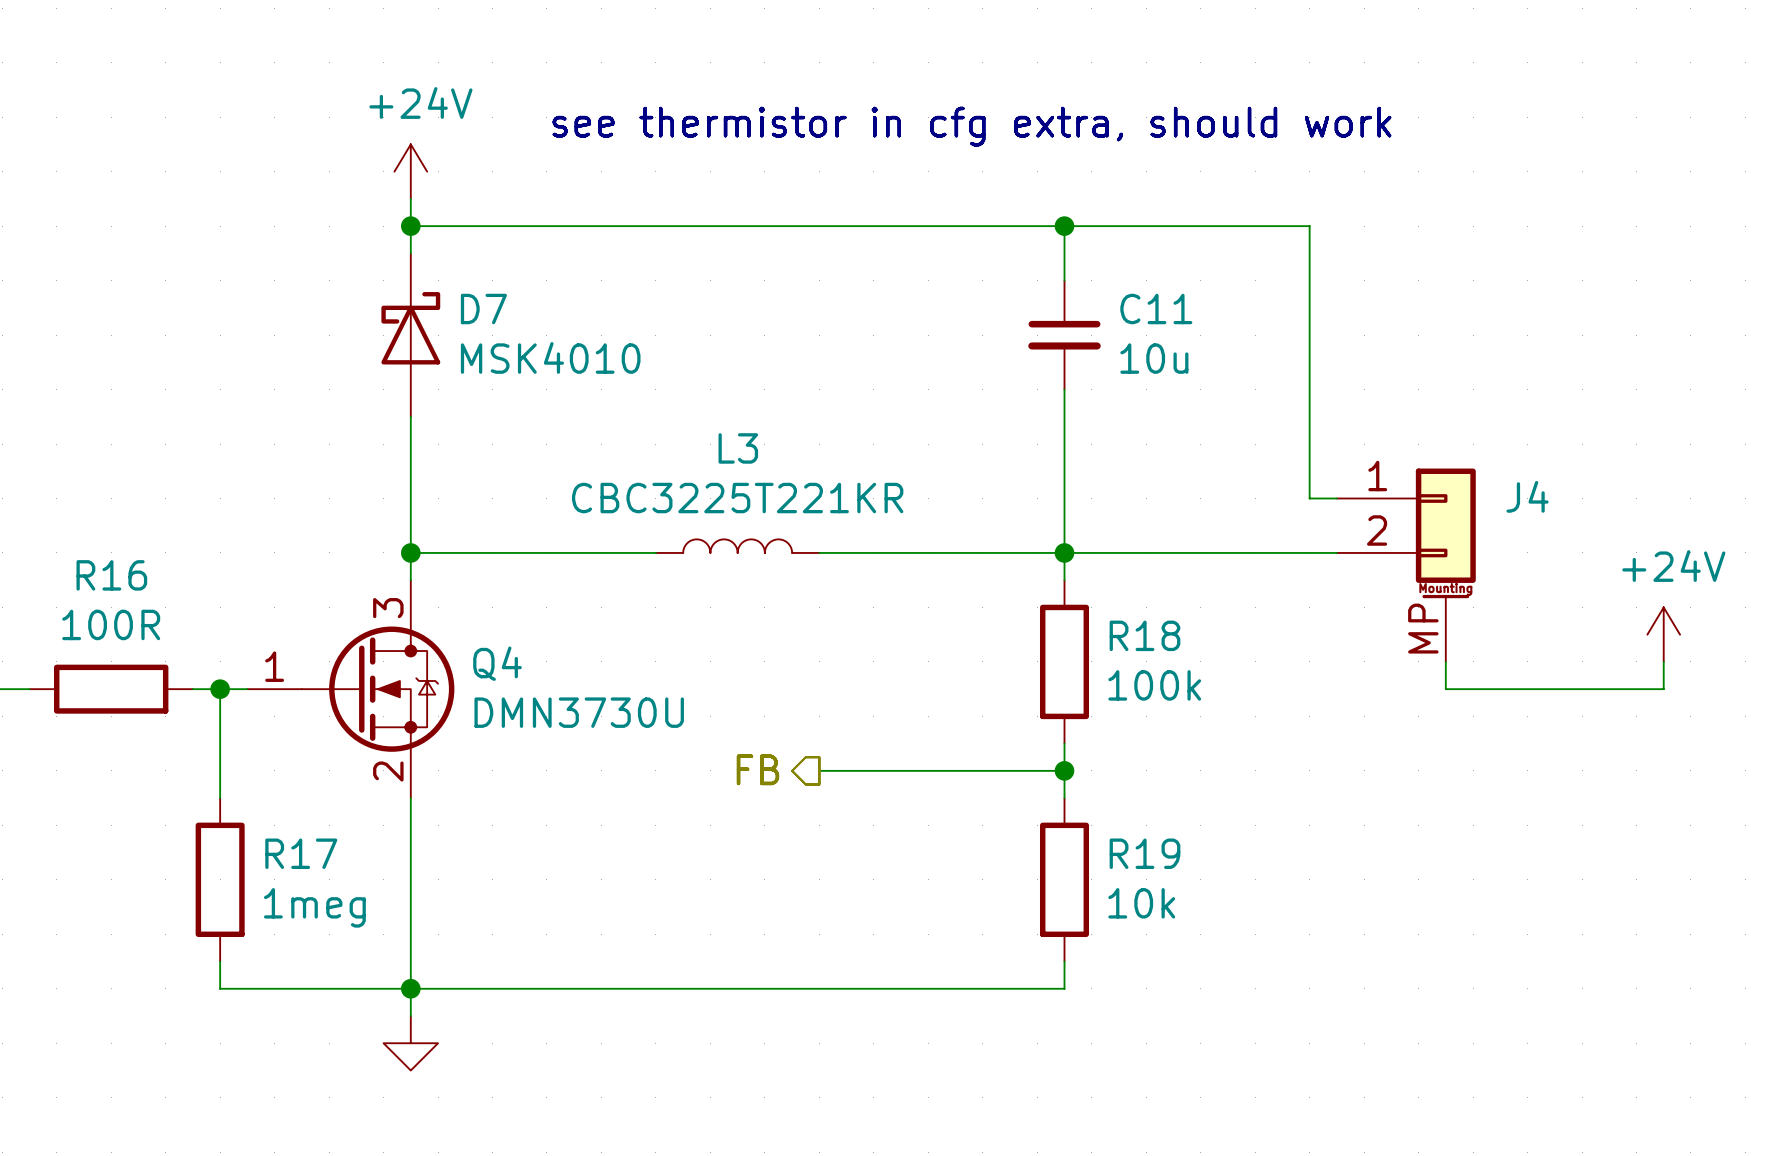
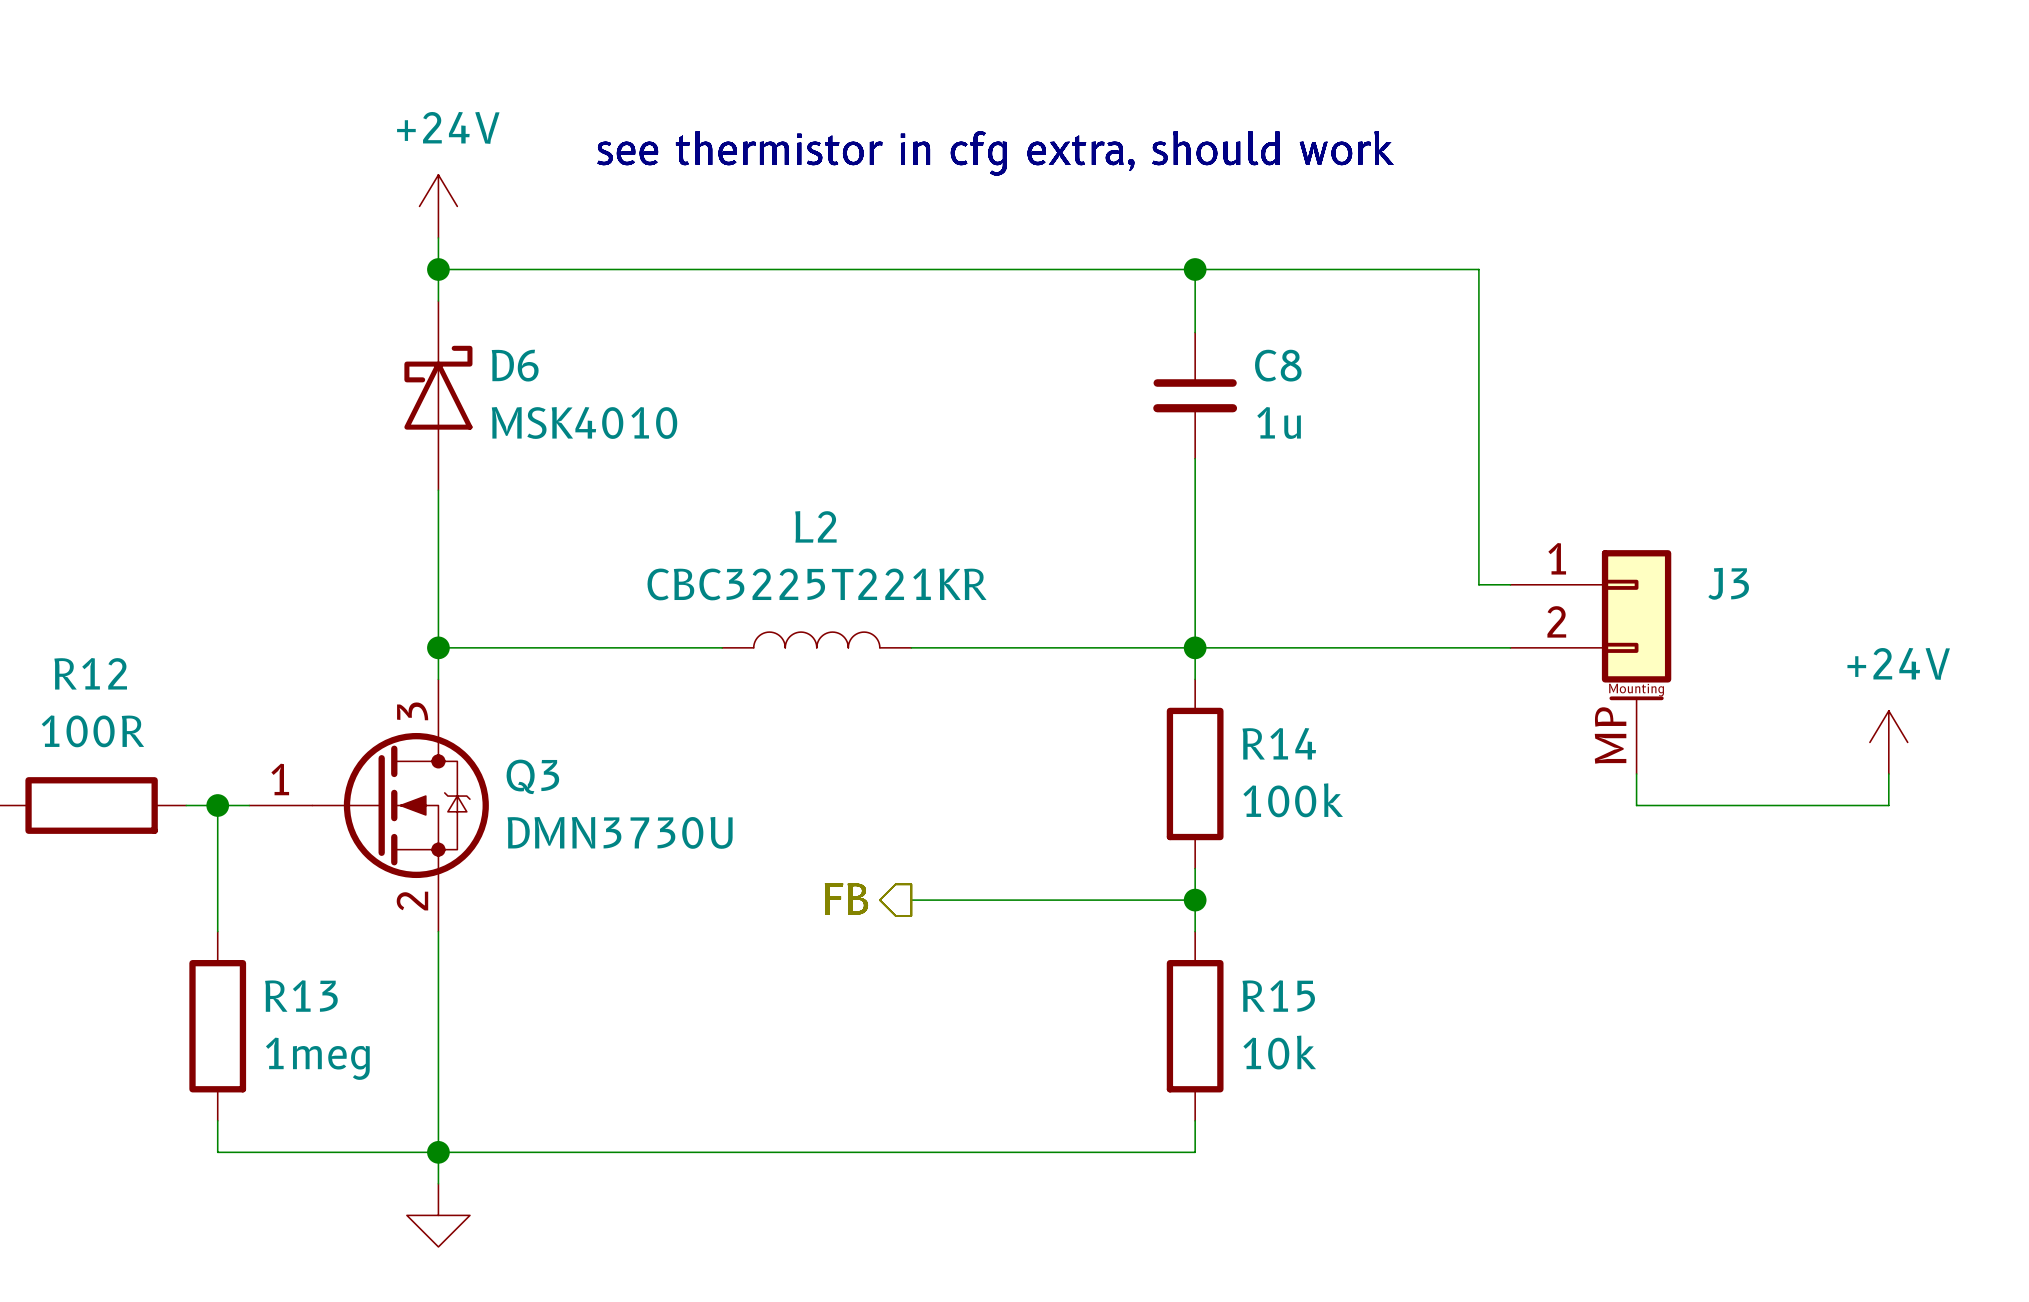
D7 name: D7 (483, 309) -> D6 (515, 365)
C11 name: C11 (1156, 309) -> C8 (1278, 365)
C11 value: 10u (1154, 358) -> 1u (1279, 422)
L3 name: L3 (738, 448) -> L2 (815, 526)
J4 name: J4 (1527, 496) -> J3 (1728, 583)
R16 name: R16 (111, 575) -> R12 (90, 673)
R18 name: R18 (1144, 635) -> R14 (1279, 743)
Q4 name: Q4 (497, 663) -> Q3 (532, 776)
R17 name: R17 (301, 853) -> R13 (301, 996)
R19 name: R19 (1144, 853) -> R15 (1278, 996)

